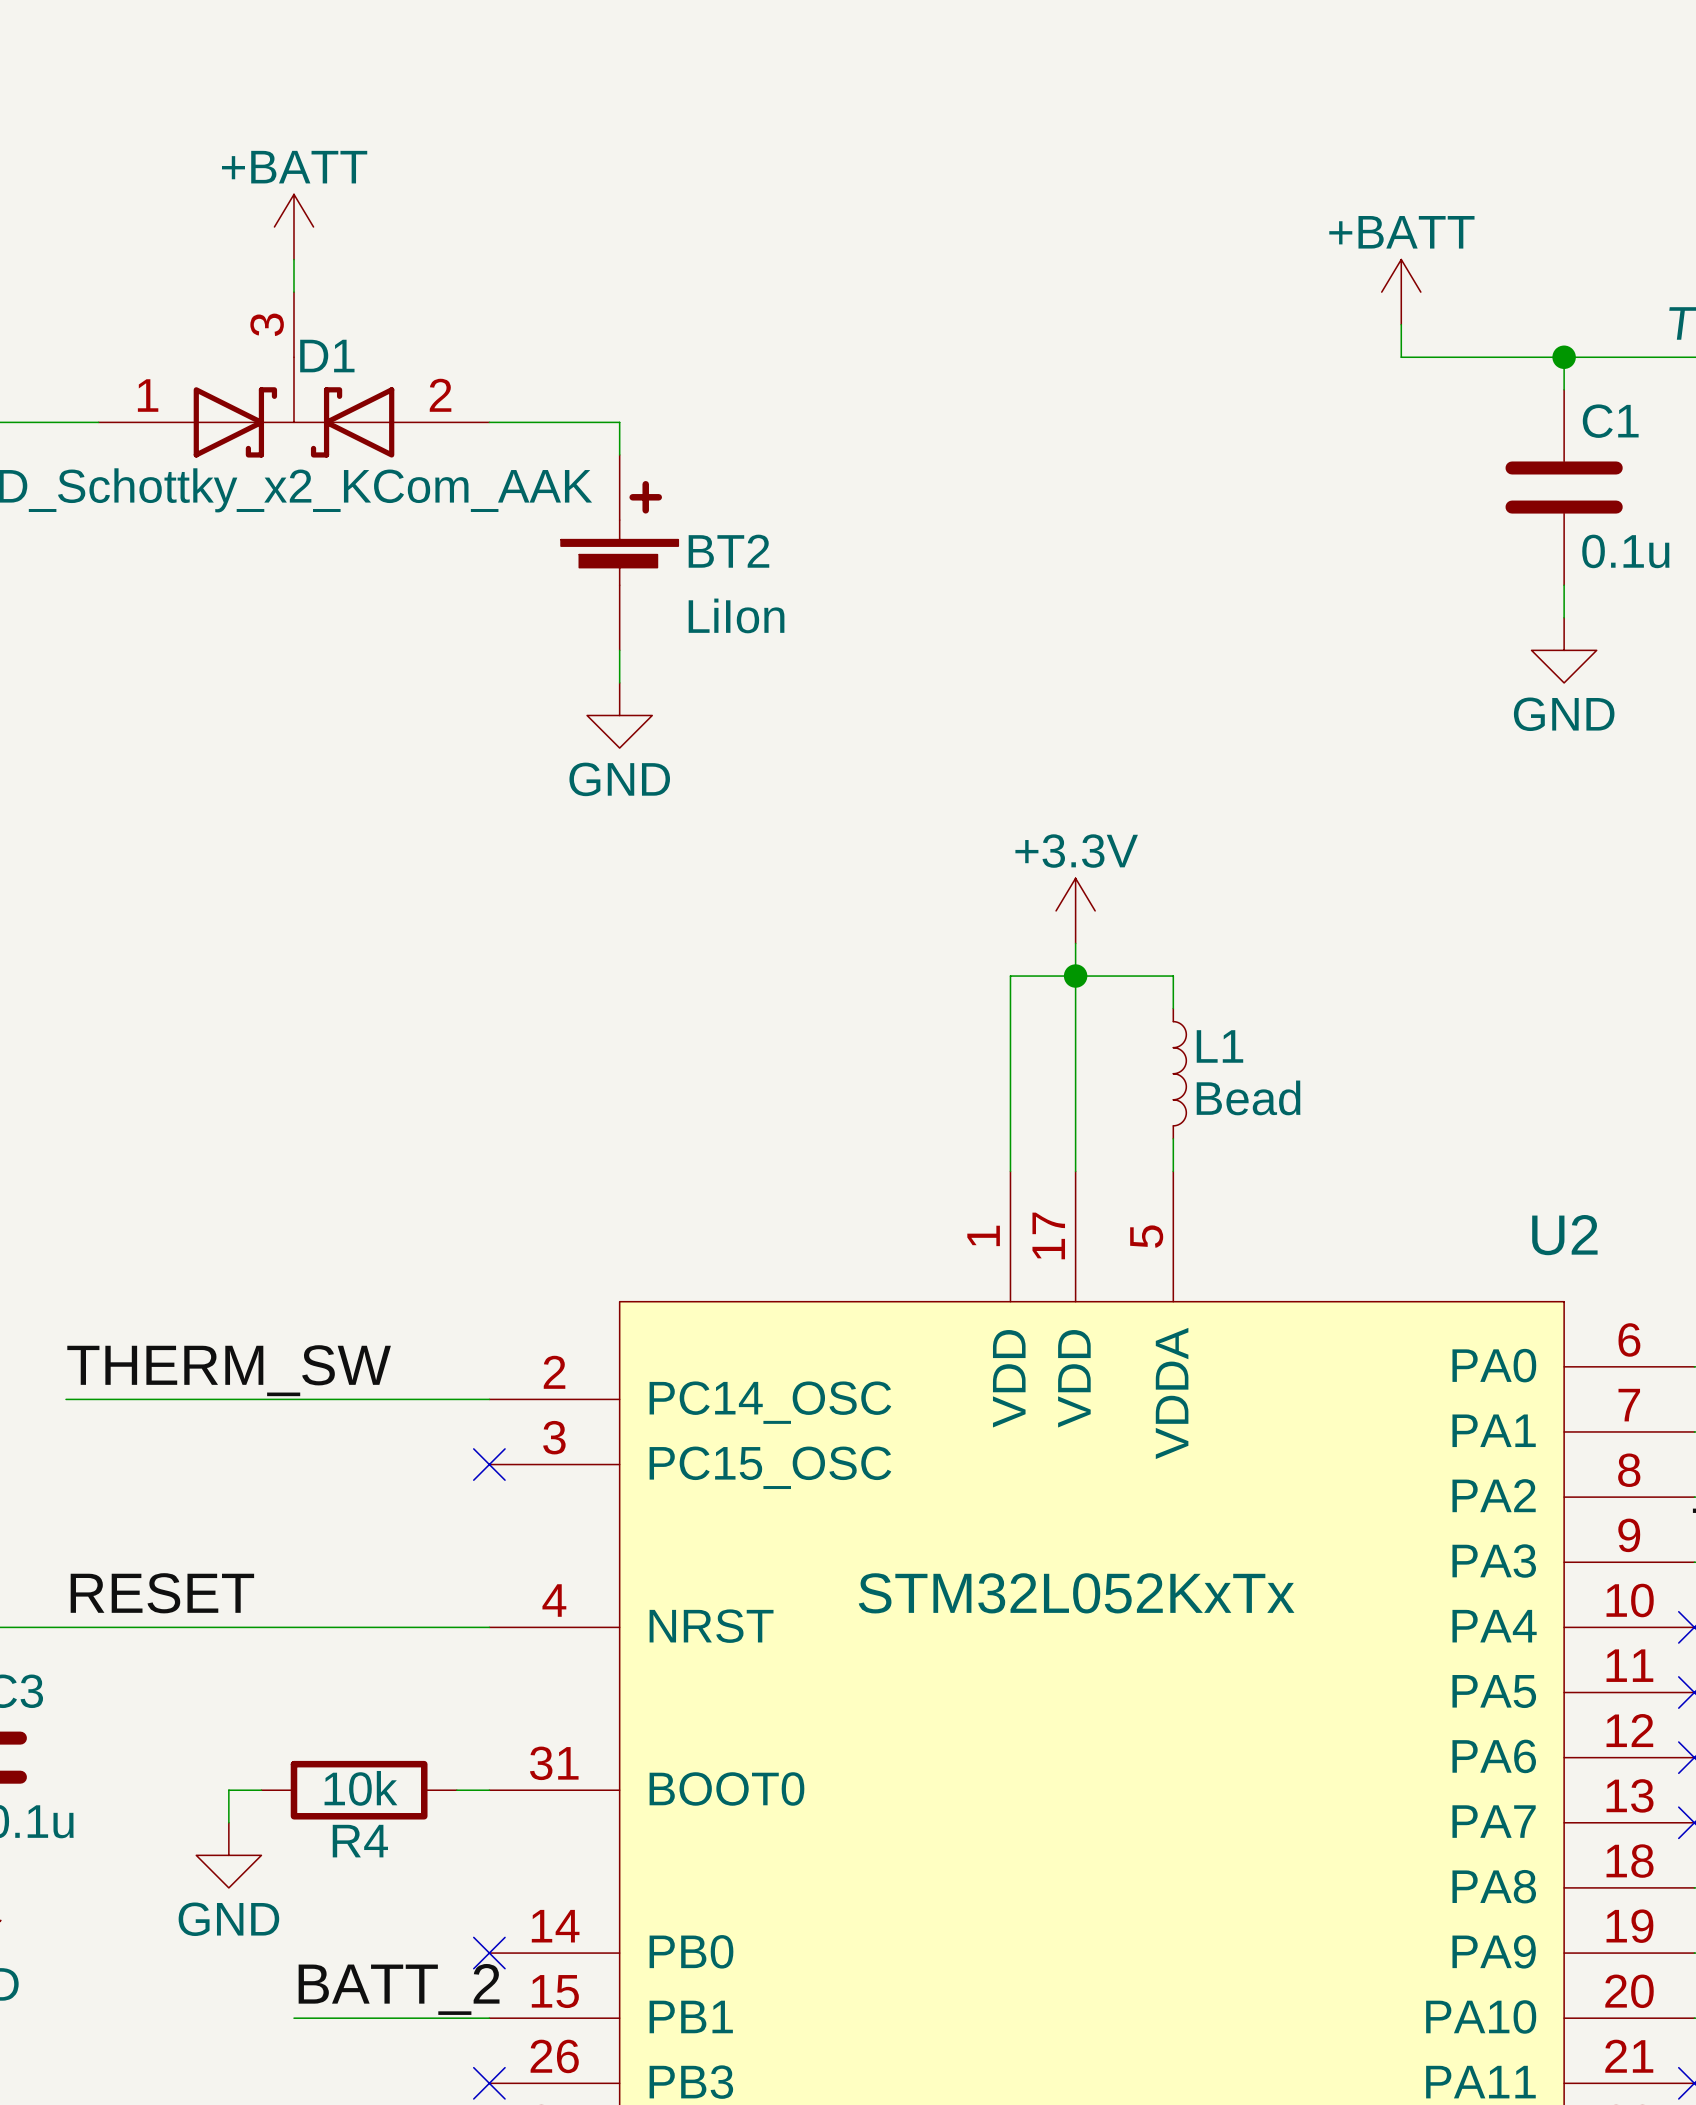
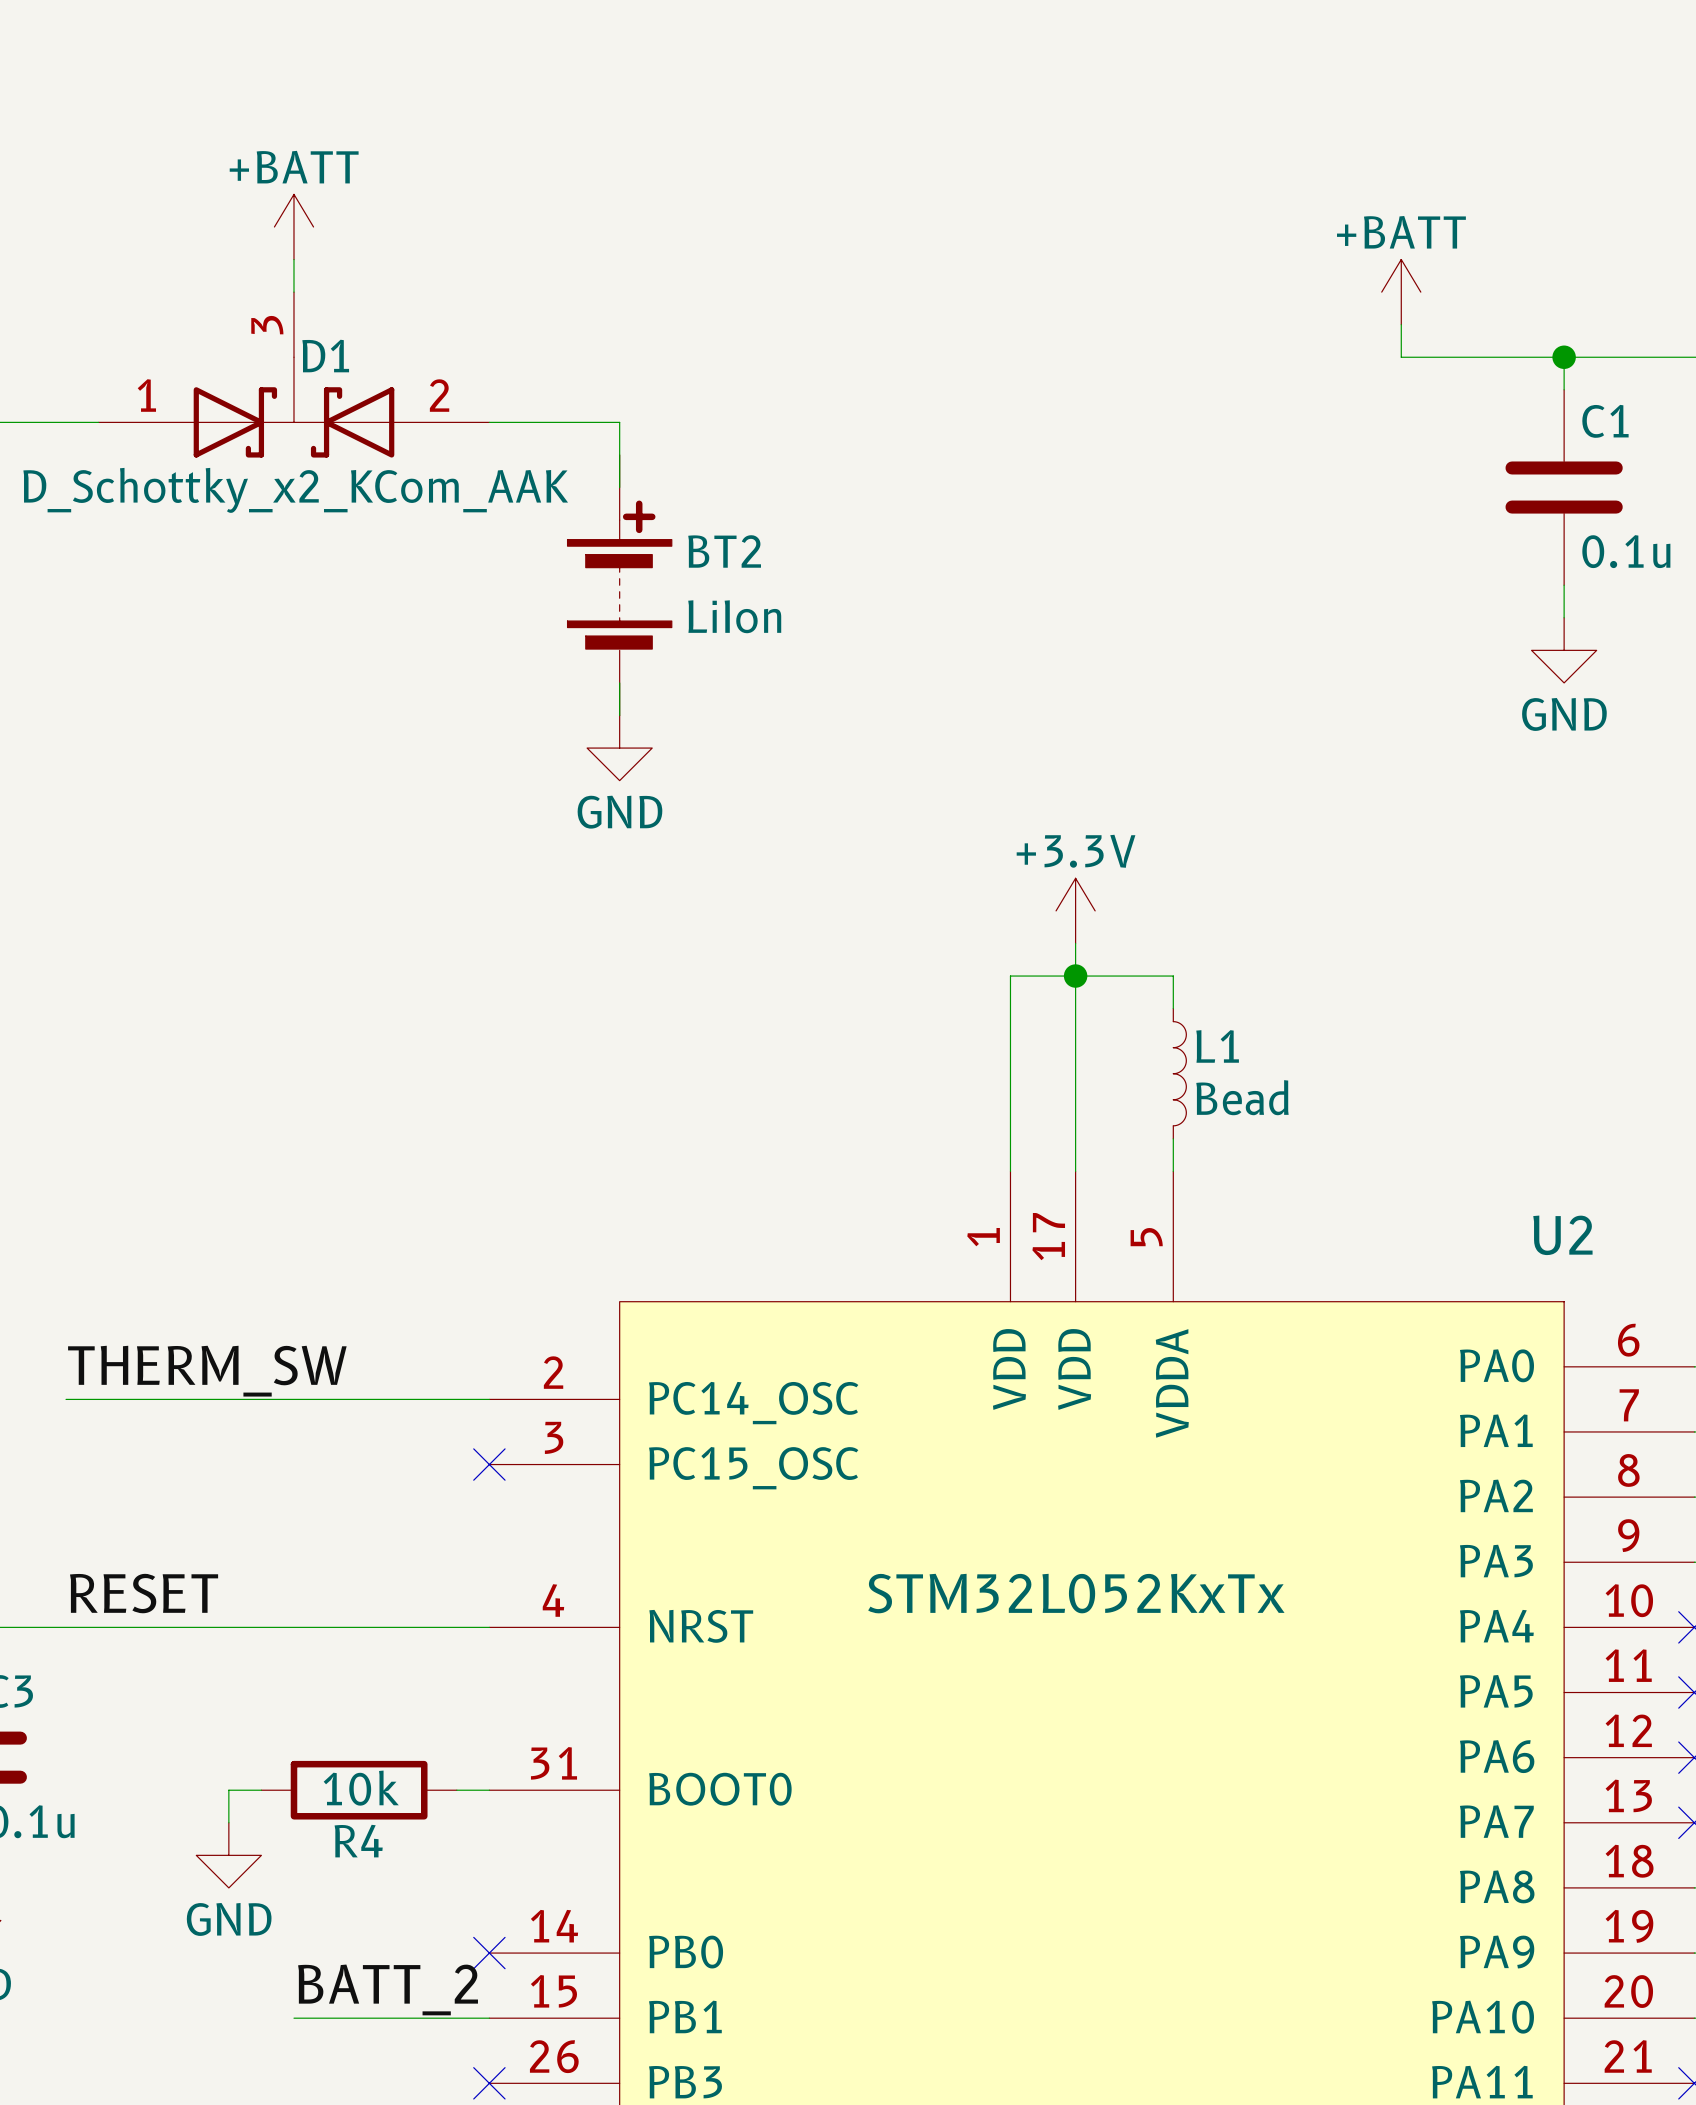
BT2 symbol: [561, 454, 679, 651] -> [567, 454, 672, 716]
power symbol position: GND (619, 715) -> GND (619, 748)

